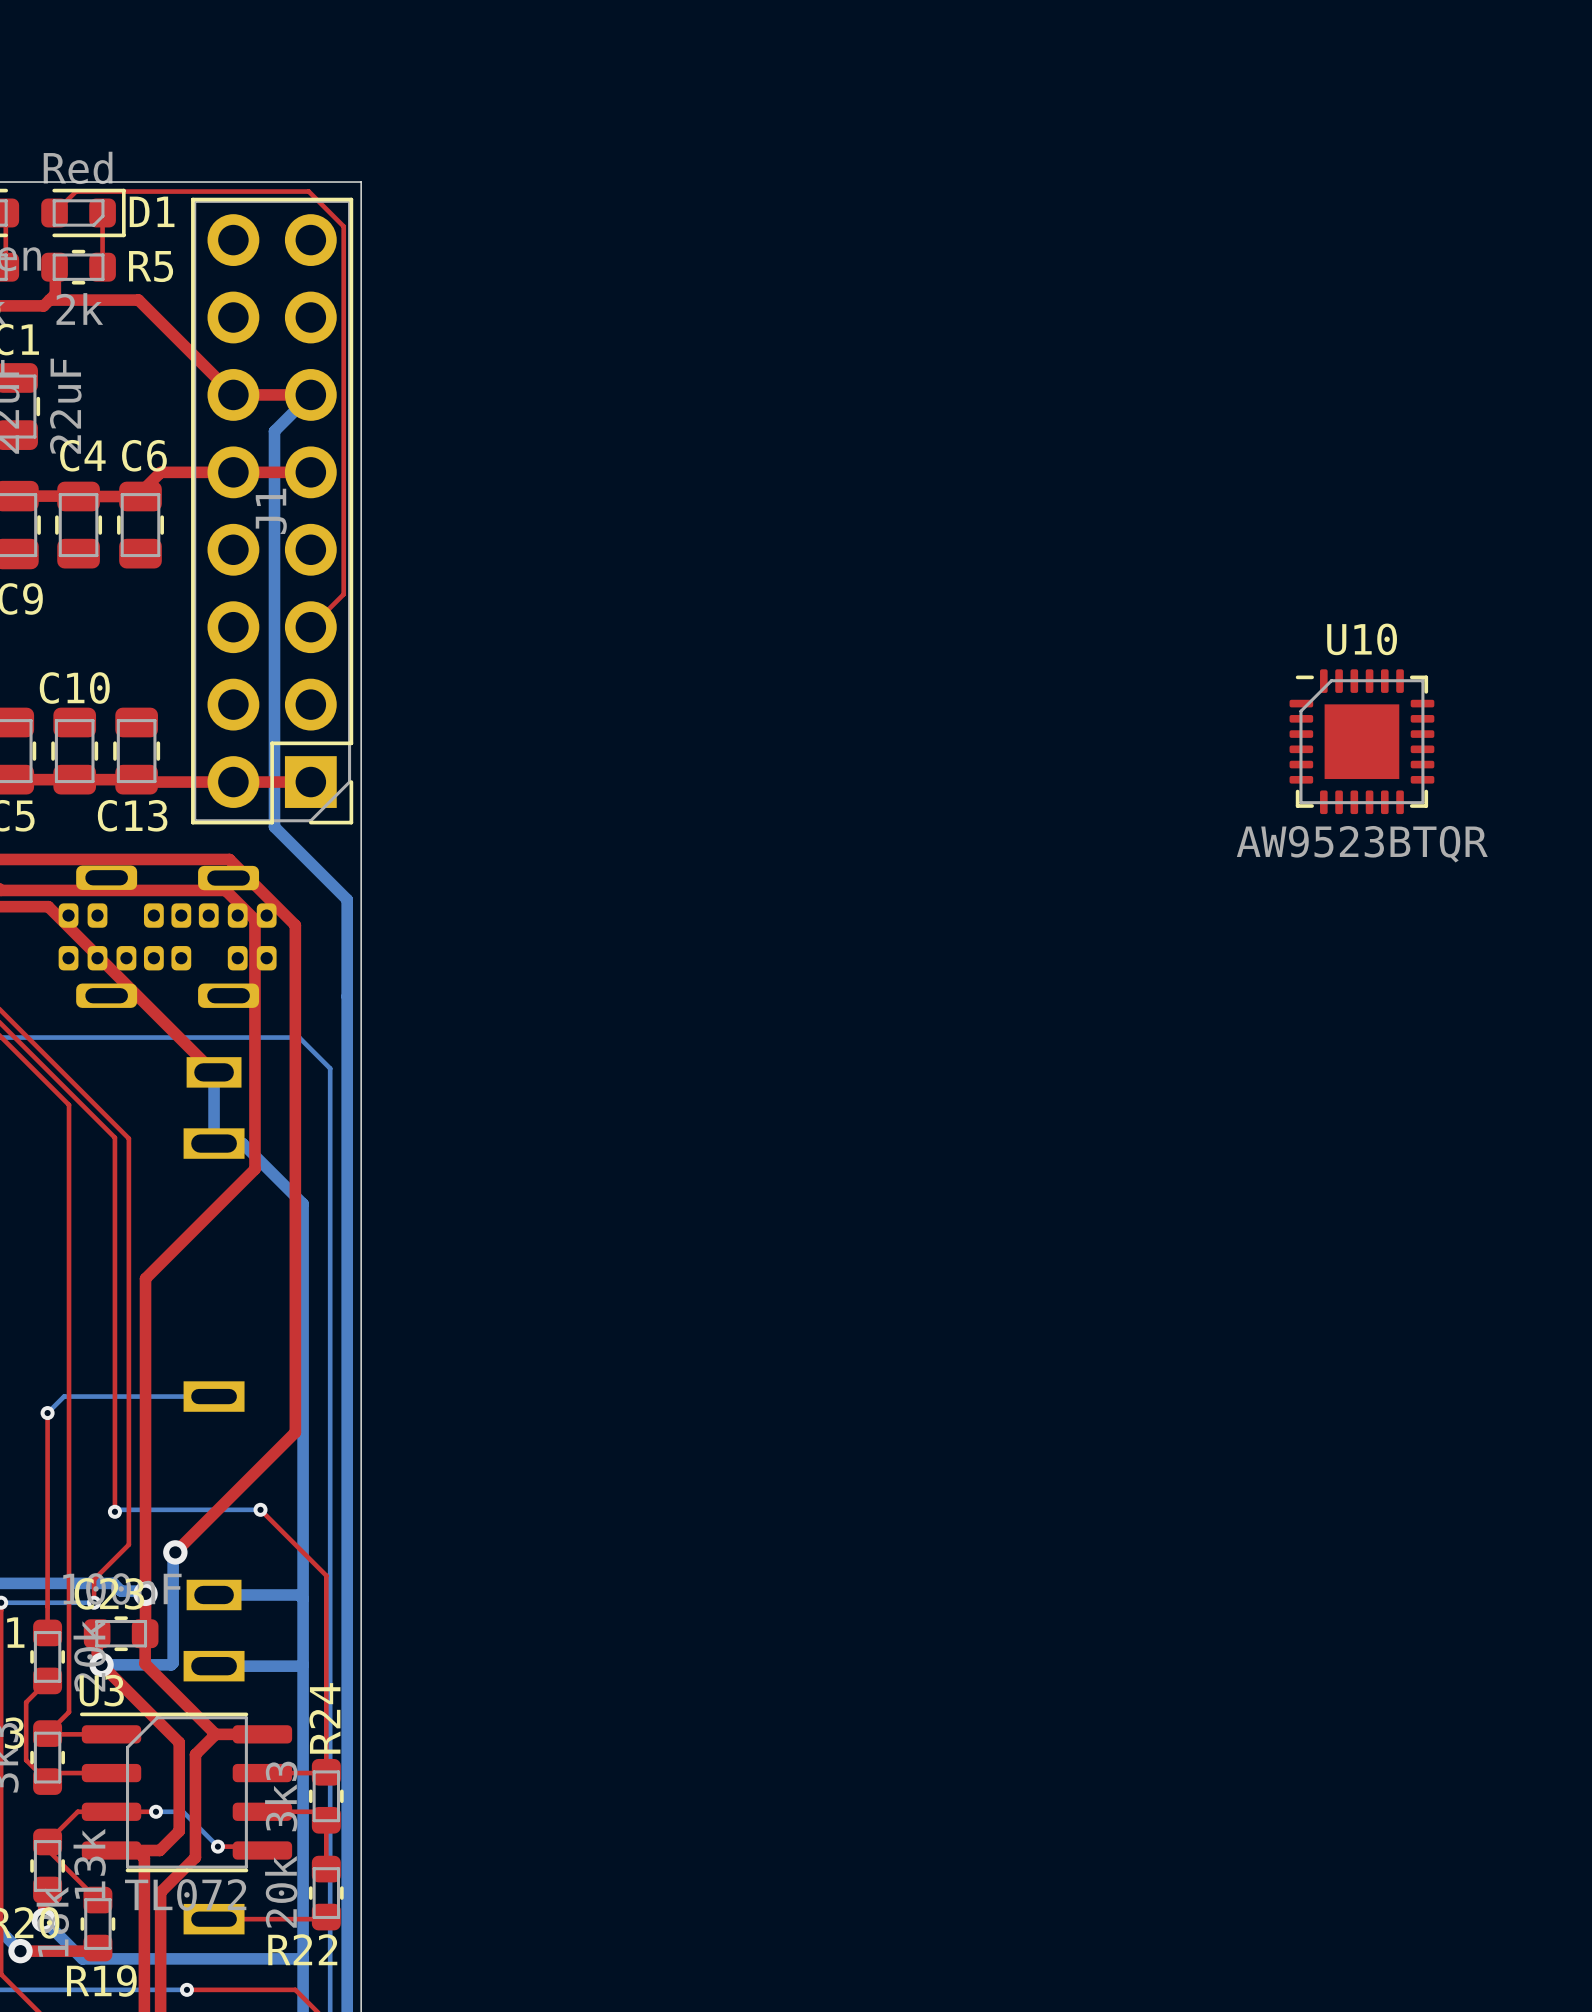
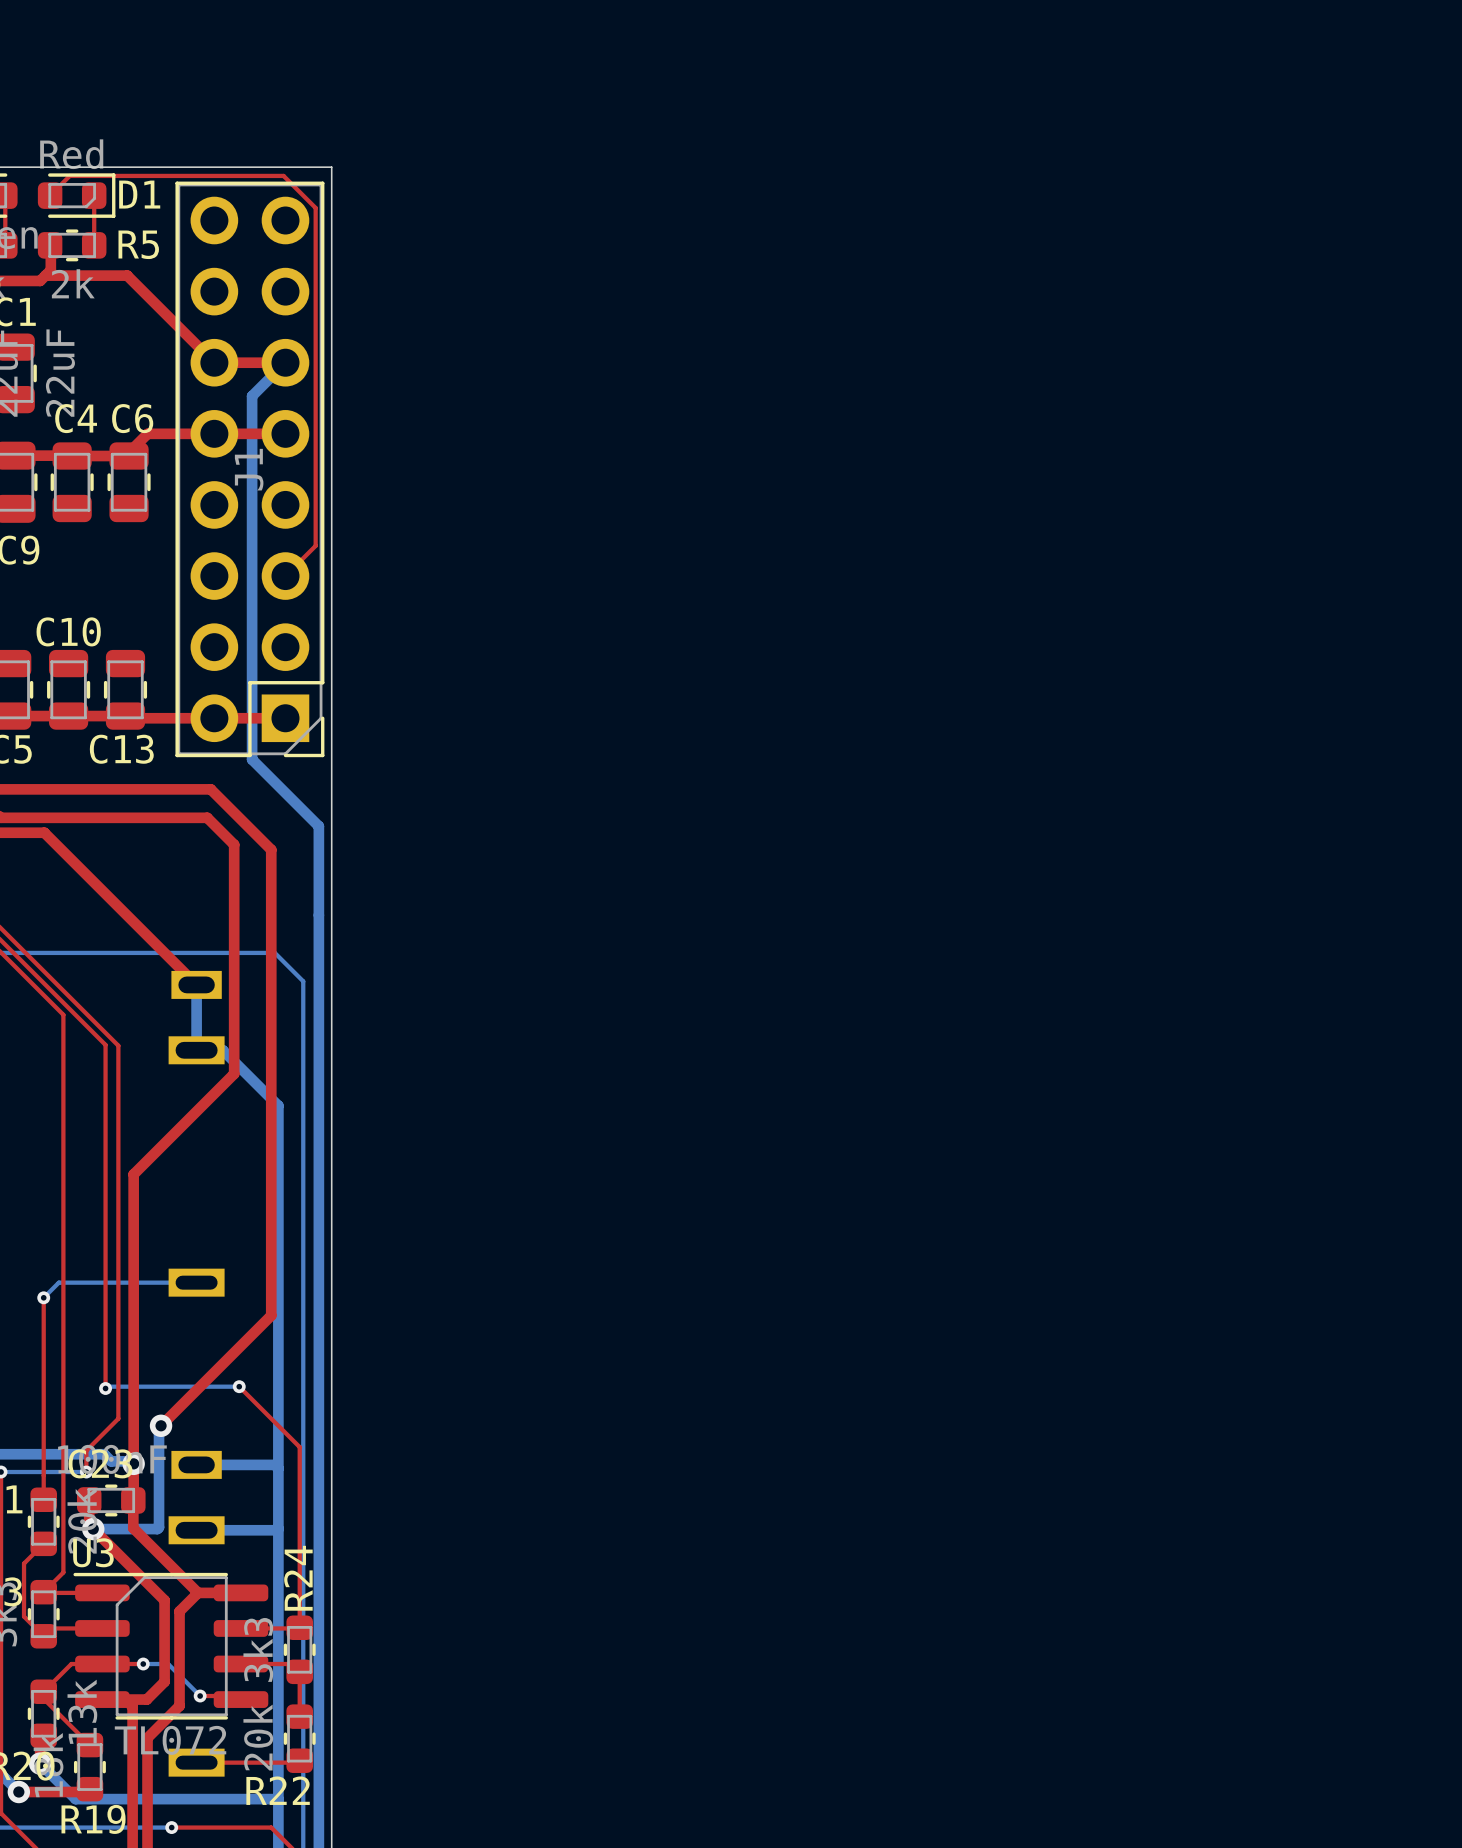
U10: AW9523BTQR (1361, 741) -> none
part: (167, 936) -> none

